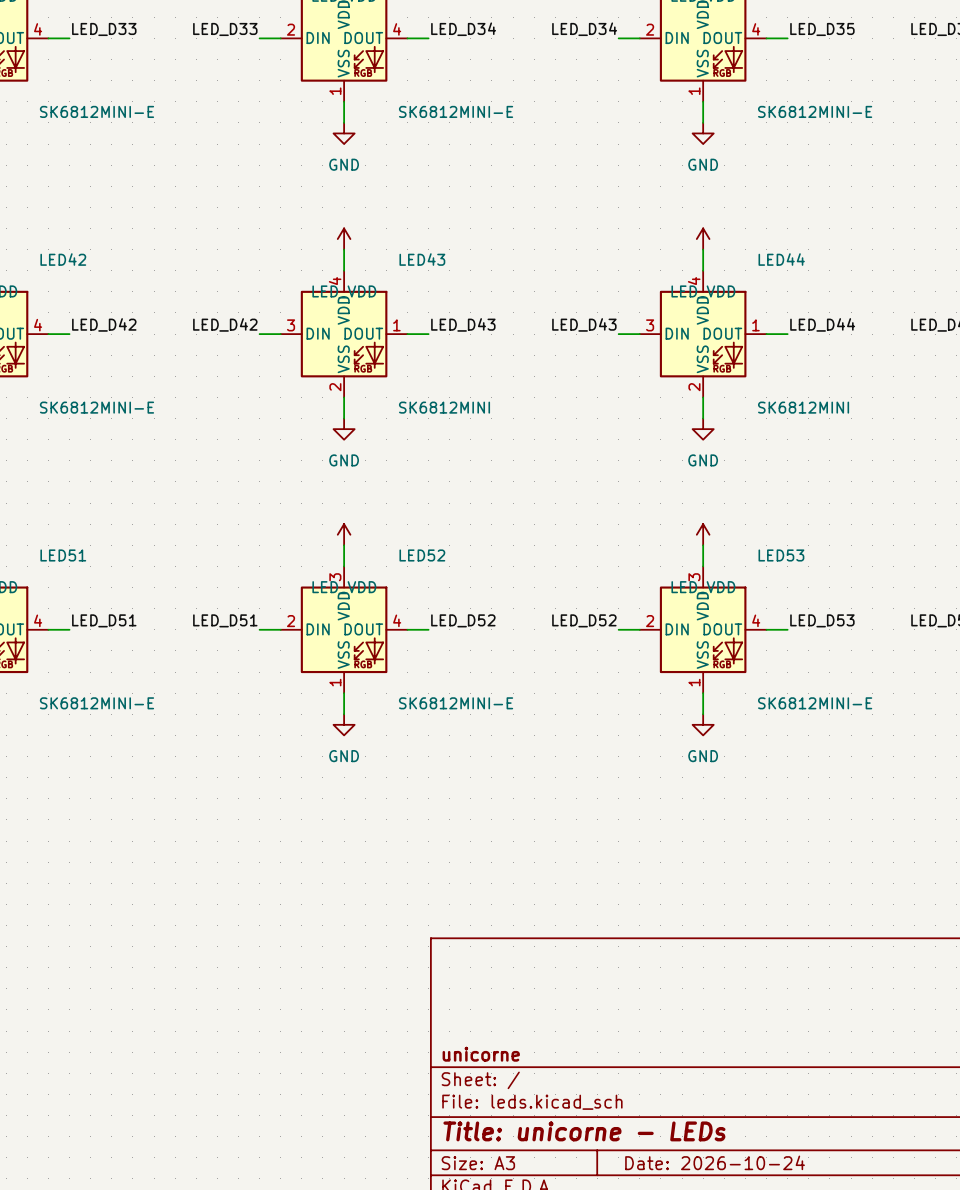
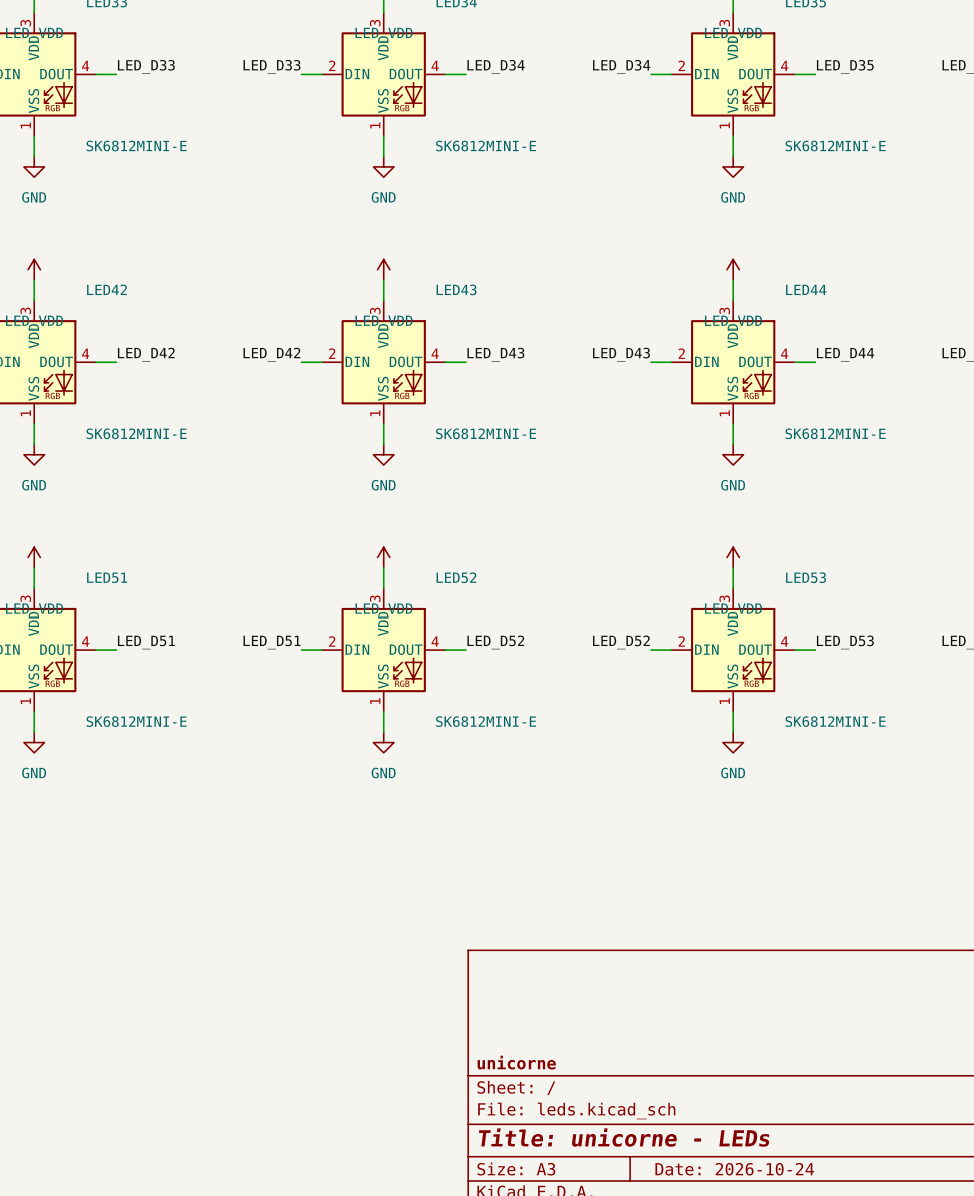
LED43 pin number: 4 (335, 281) -> 3 (375, 310)
LED44 pin number: 4 (694, 281) -> 3 (724, 310)
LED43 pin number: 3 (291, 325) -> 2 (332, 353)
LED43 pin number: 1 (396, 325) -> 4 (435, 353)
LED44 pin number: 3 (650, 325) -> 2 (681, 353)
LED44 pin number: 1 (755, 325) -> 4 (784, 353)
LED43 pin number: 2 (335, 387) -> 1 (375, 413)
LED44 pin number: 2 (694, 387) -> 1 (724, 413)
LED43 value: SK6812MINI (444, 407) -> SK6812MINI-E (486, 433)
LED44 value: SK6812MINI (803, 407) -> SK6812MINI-E (835, 433)

